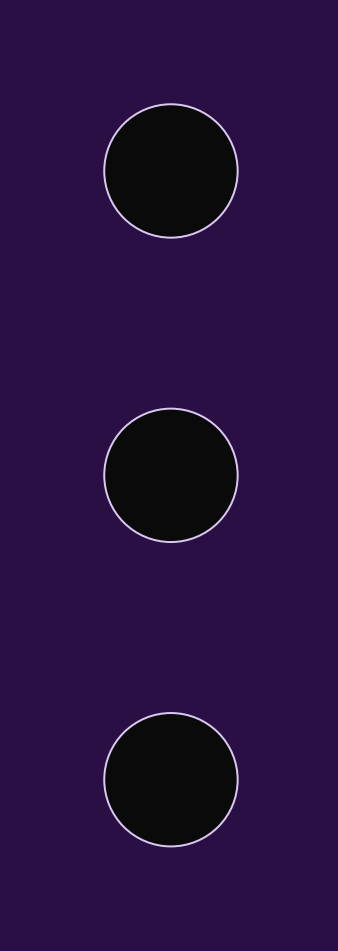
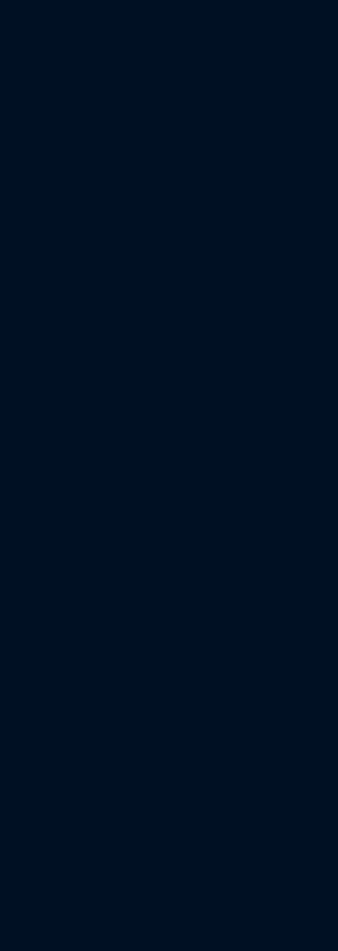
part: (170, 170) -> none
part: (170, 475) -> none
part: (170, 779) -> none

